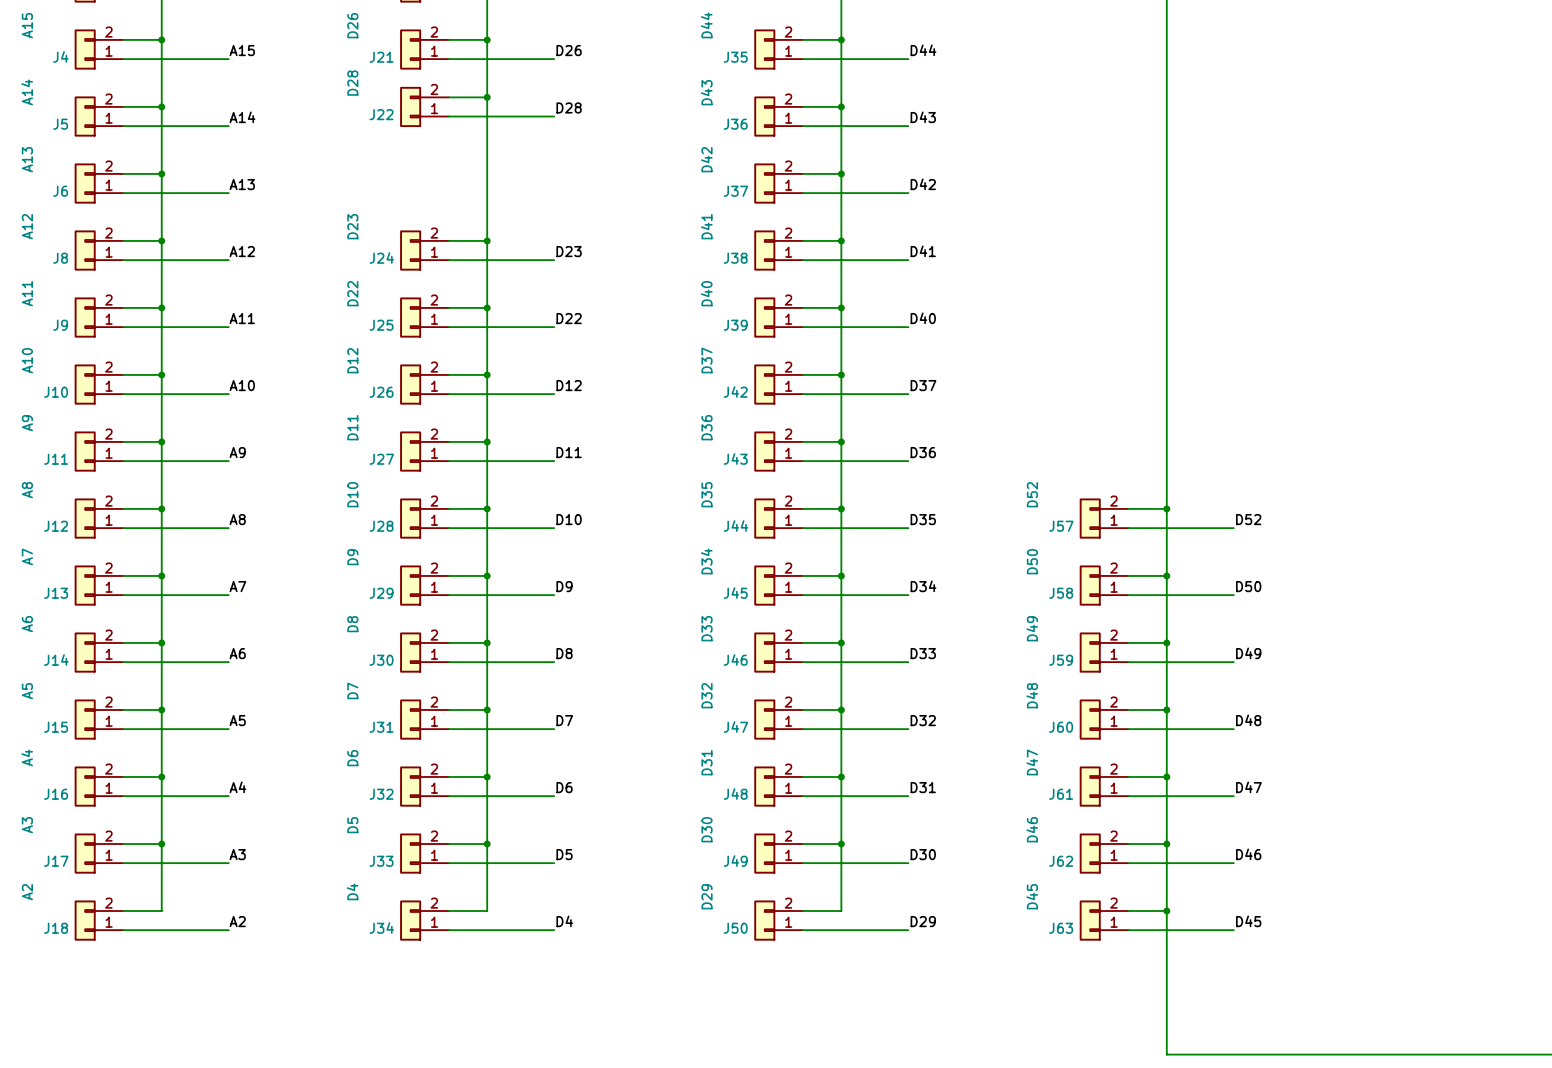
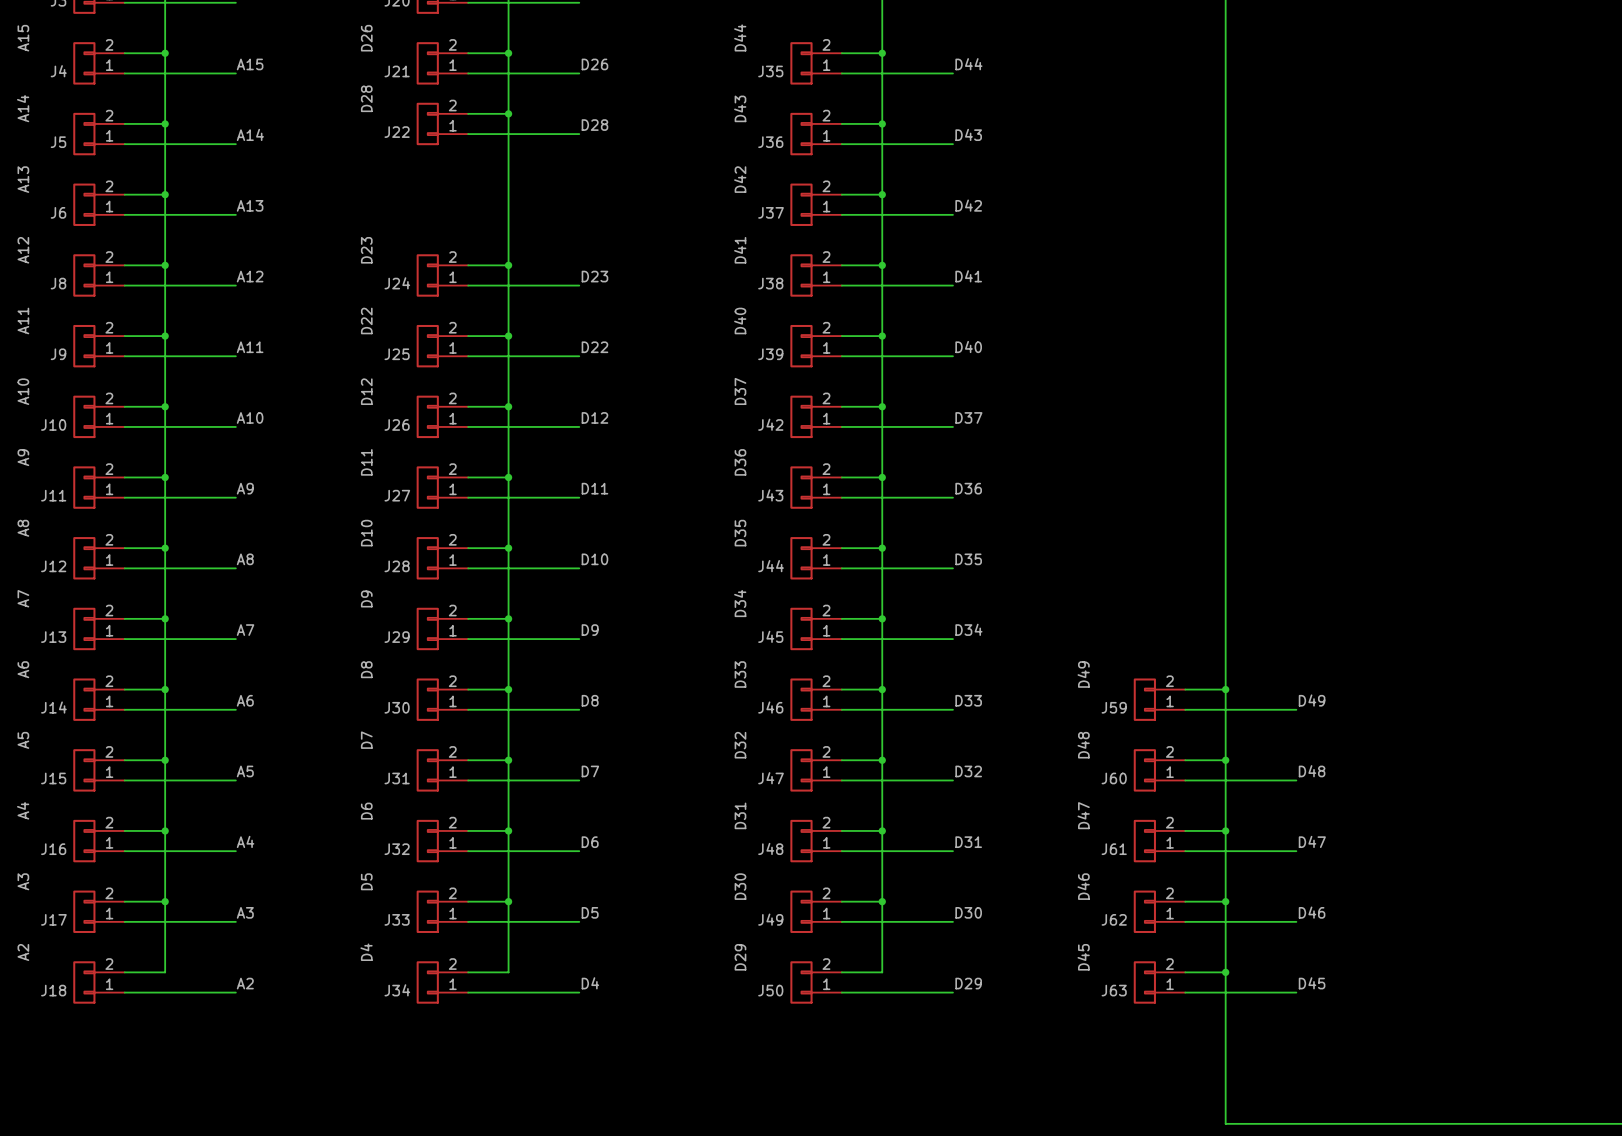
wire: (1128, 508) (1166, 508) -> none
junction: (1166, 508) -> none
J57: D52 (1104, 518) -> none
label: D52 (1248, 519) -> none
wire: (1128, 528) (1233, 528) -> none
wire: (1128, 575) (1166, 575) -> none
junction: (1166, 575) -> none
J58: D50 (1104, 585) -> none
label: D50 (1248, 586) -> none
wire: (1128, 595) (1233, 595) -> none

